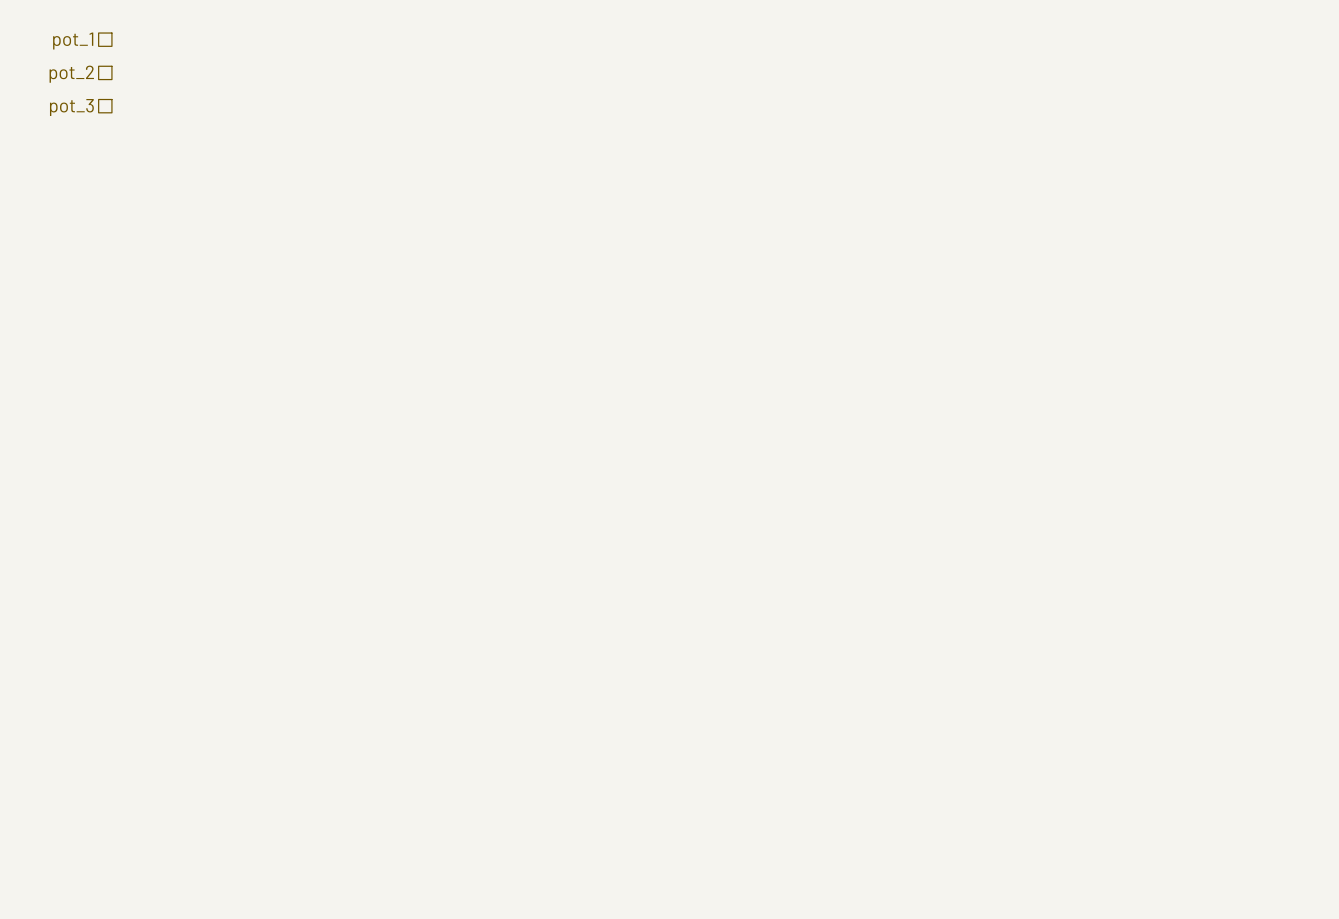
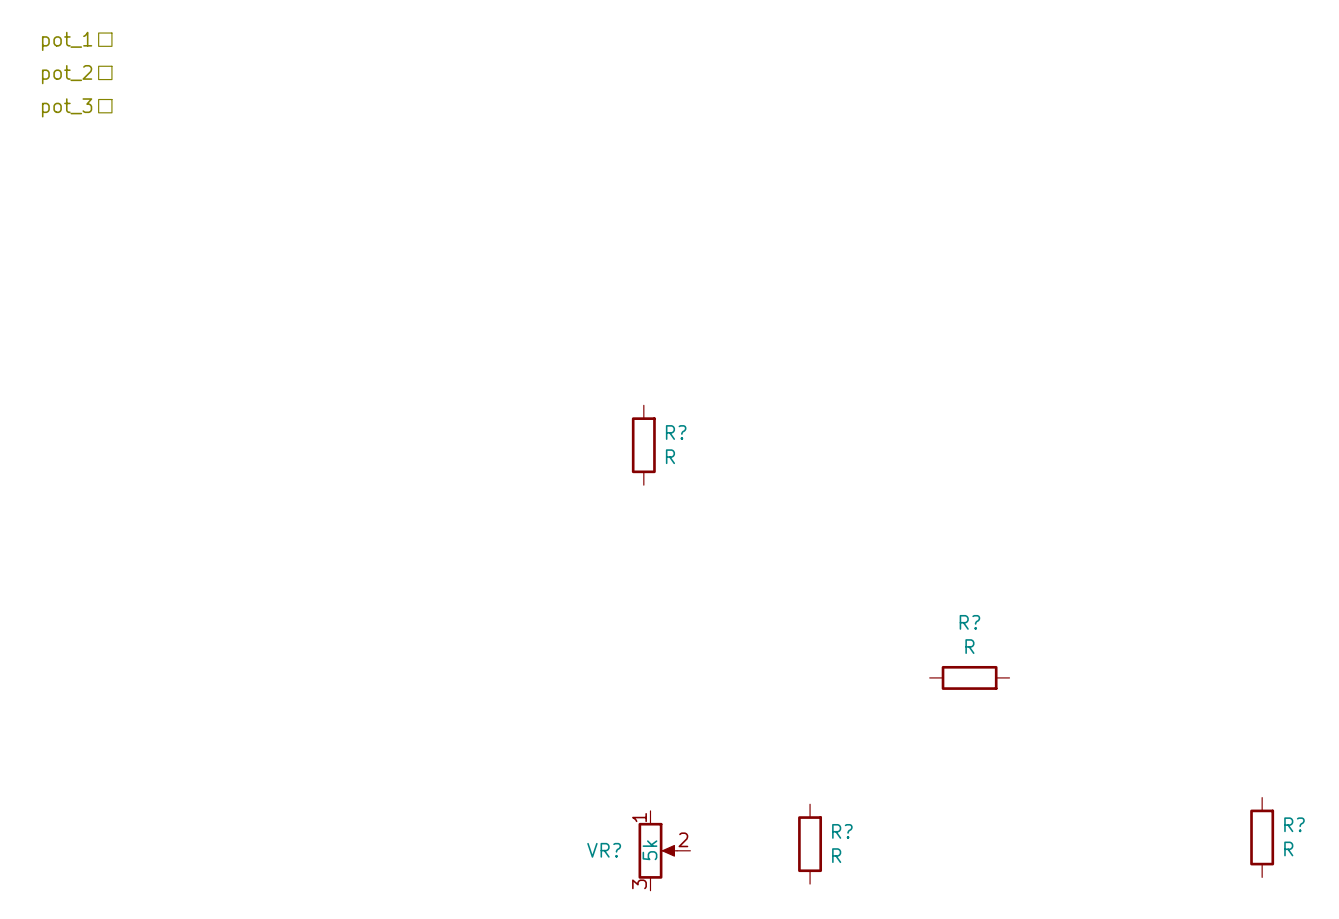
R?: none -> R (643, 445)
R?: none -> R (969, 677)
R?: none -> R (1262, 837)
R?: none -> R (810, 844)
VR?: none -> 5k (664, 850)

